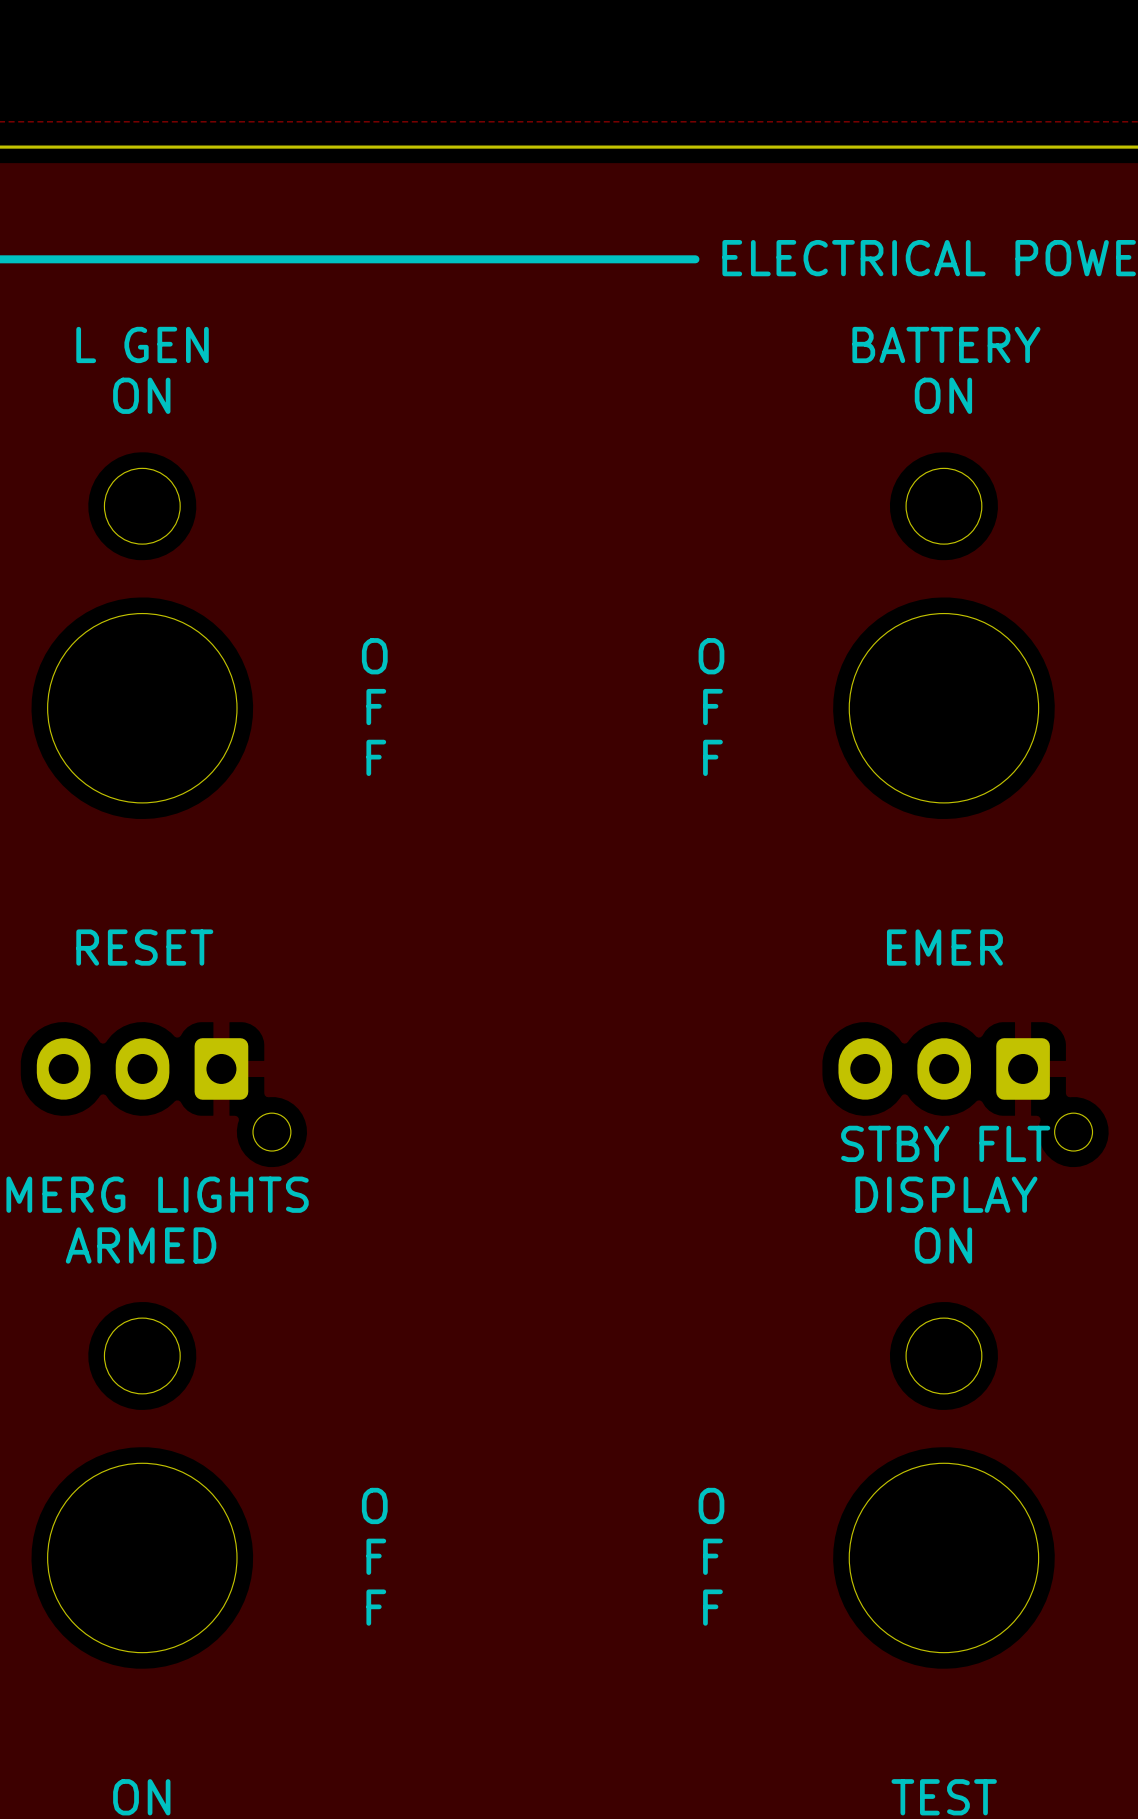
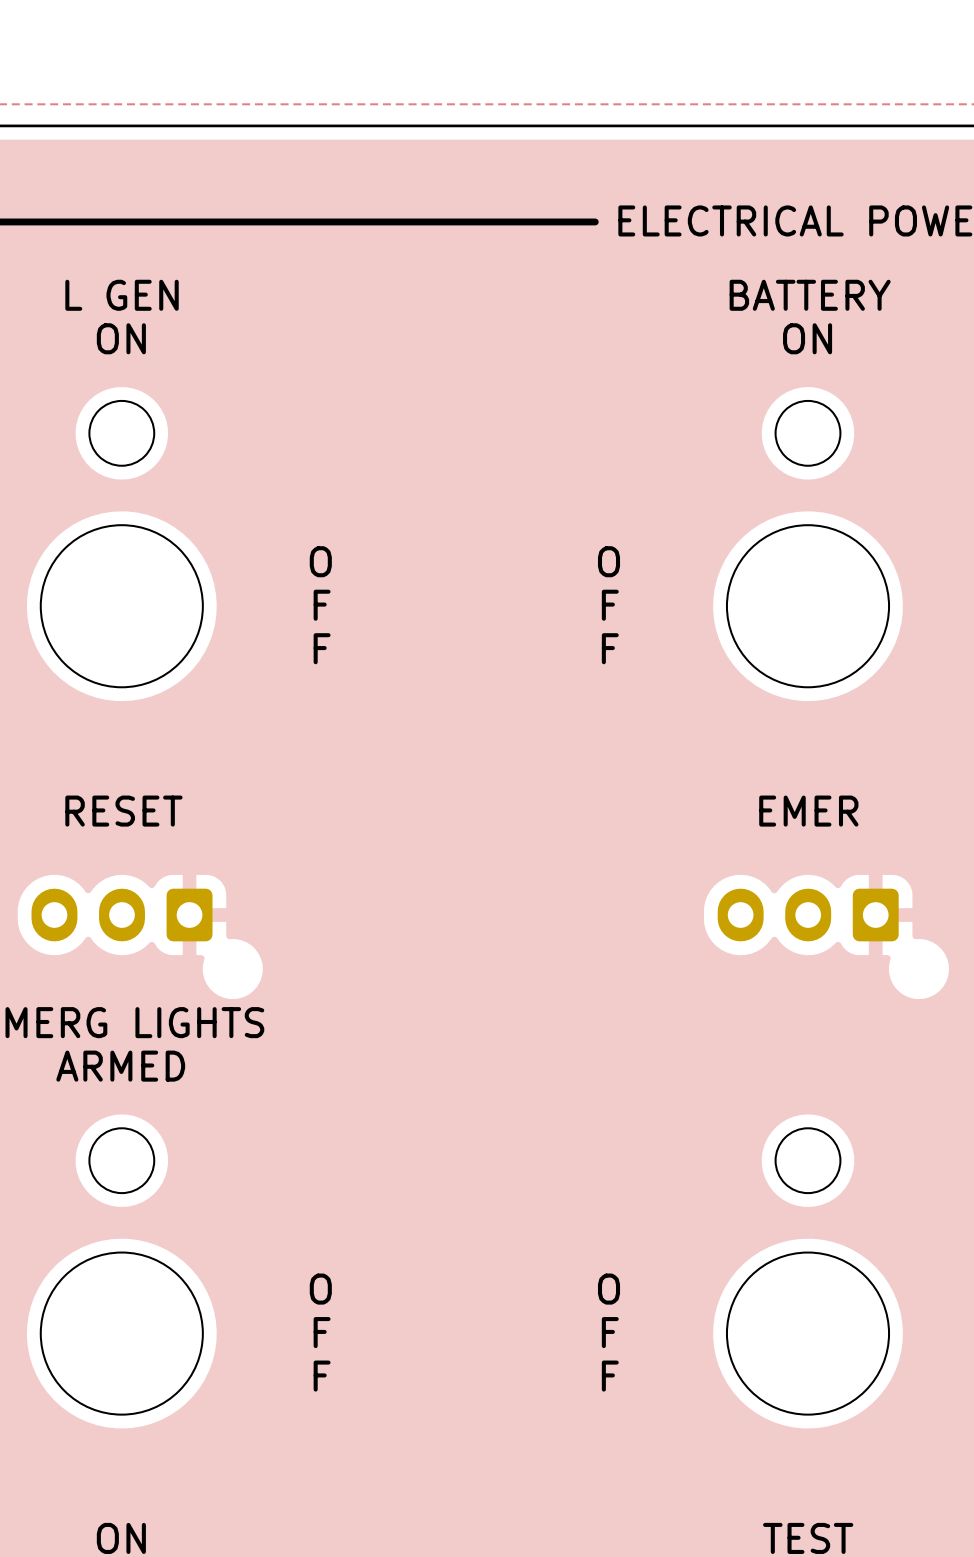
part: (163, 1094) -> none
part: (965, 1094) -> none
text: STBY FLT (945, 1143) -> none
text: DISPLAY (946, 1194) -> none
text: ON (943, 1245) -> none

